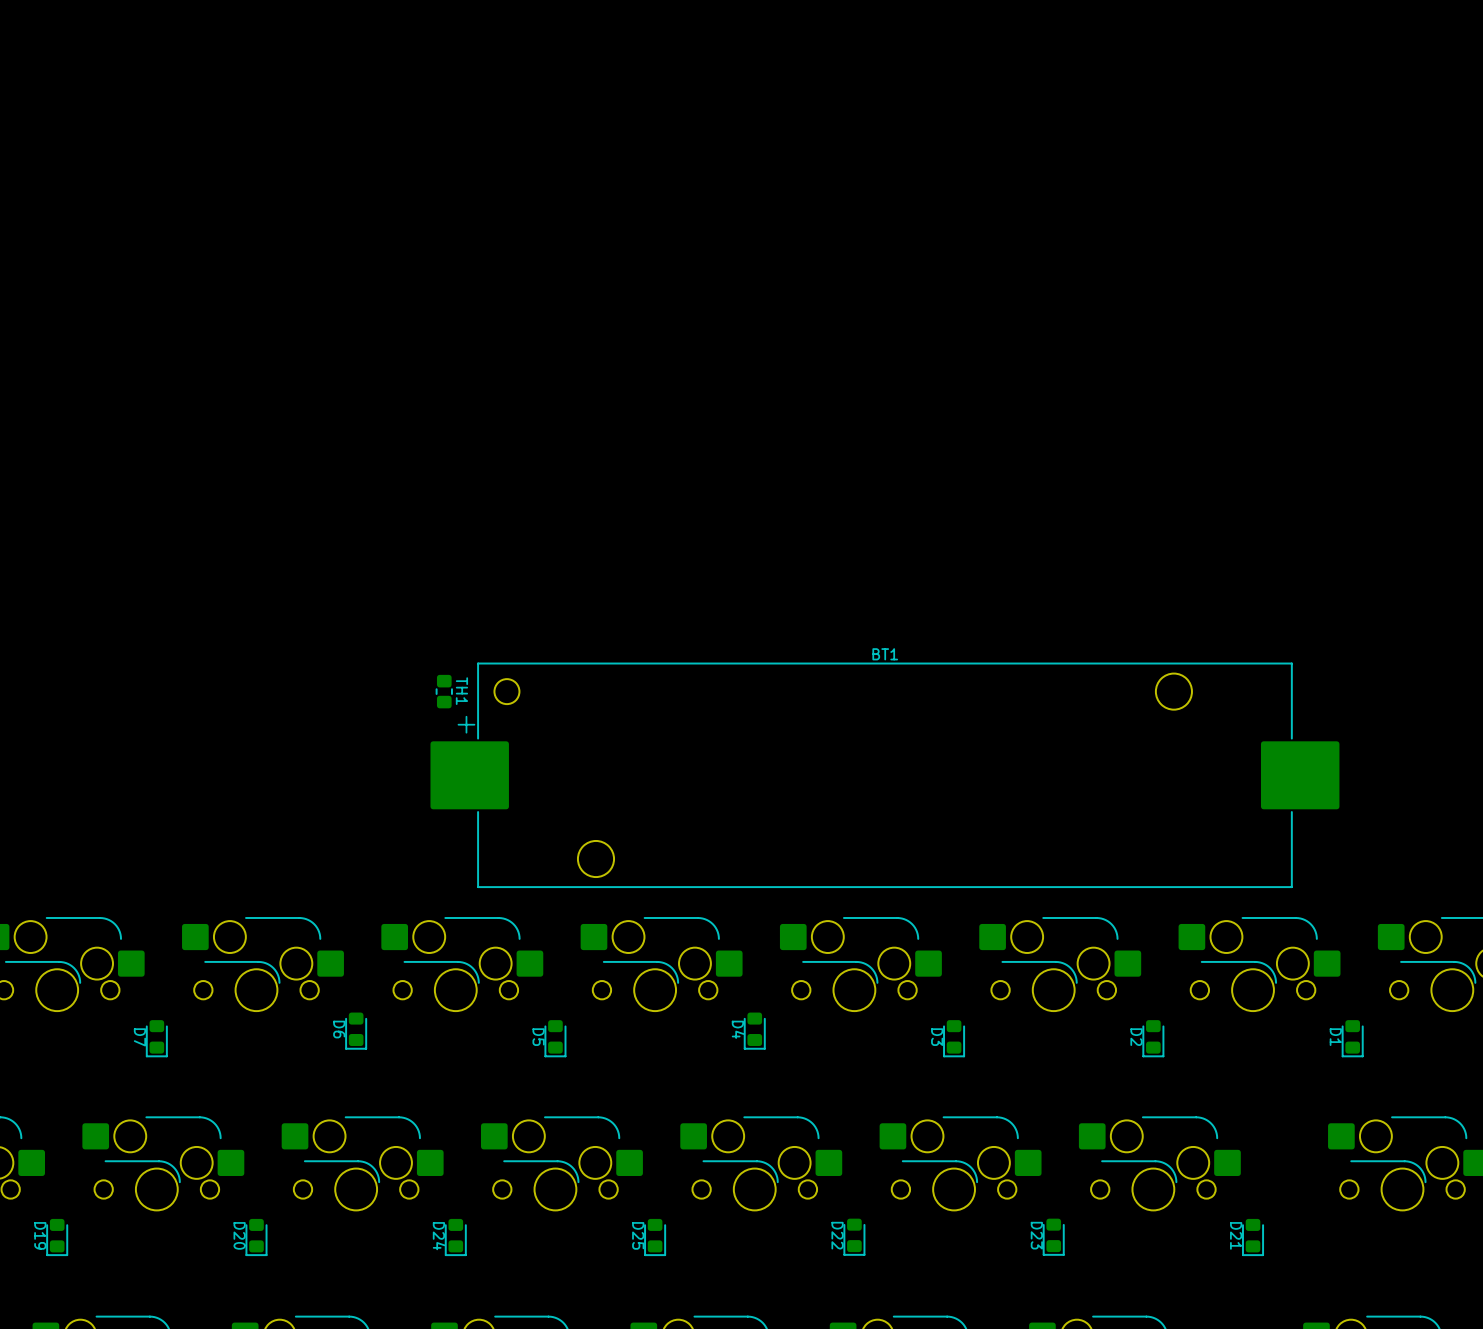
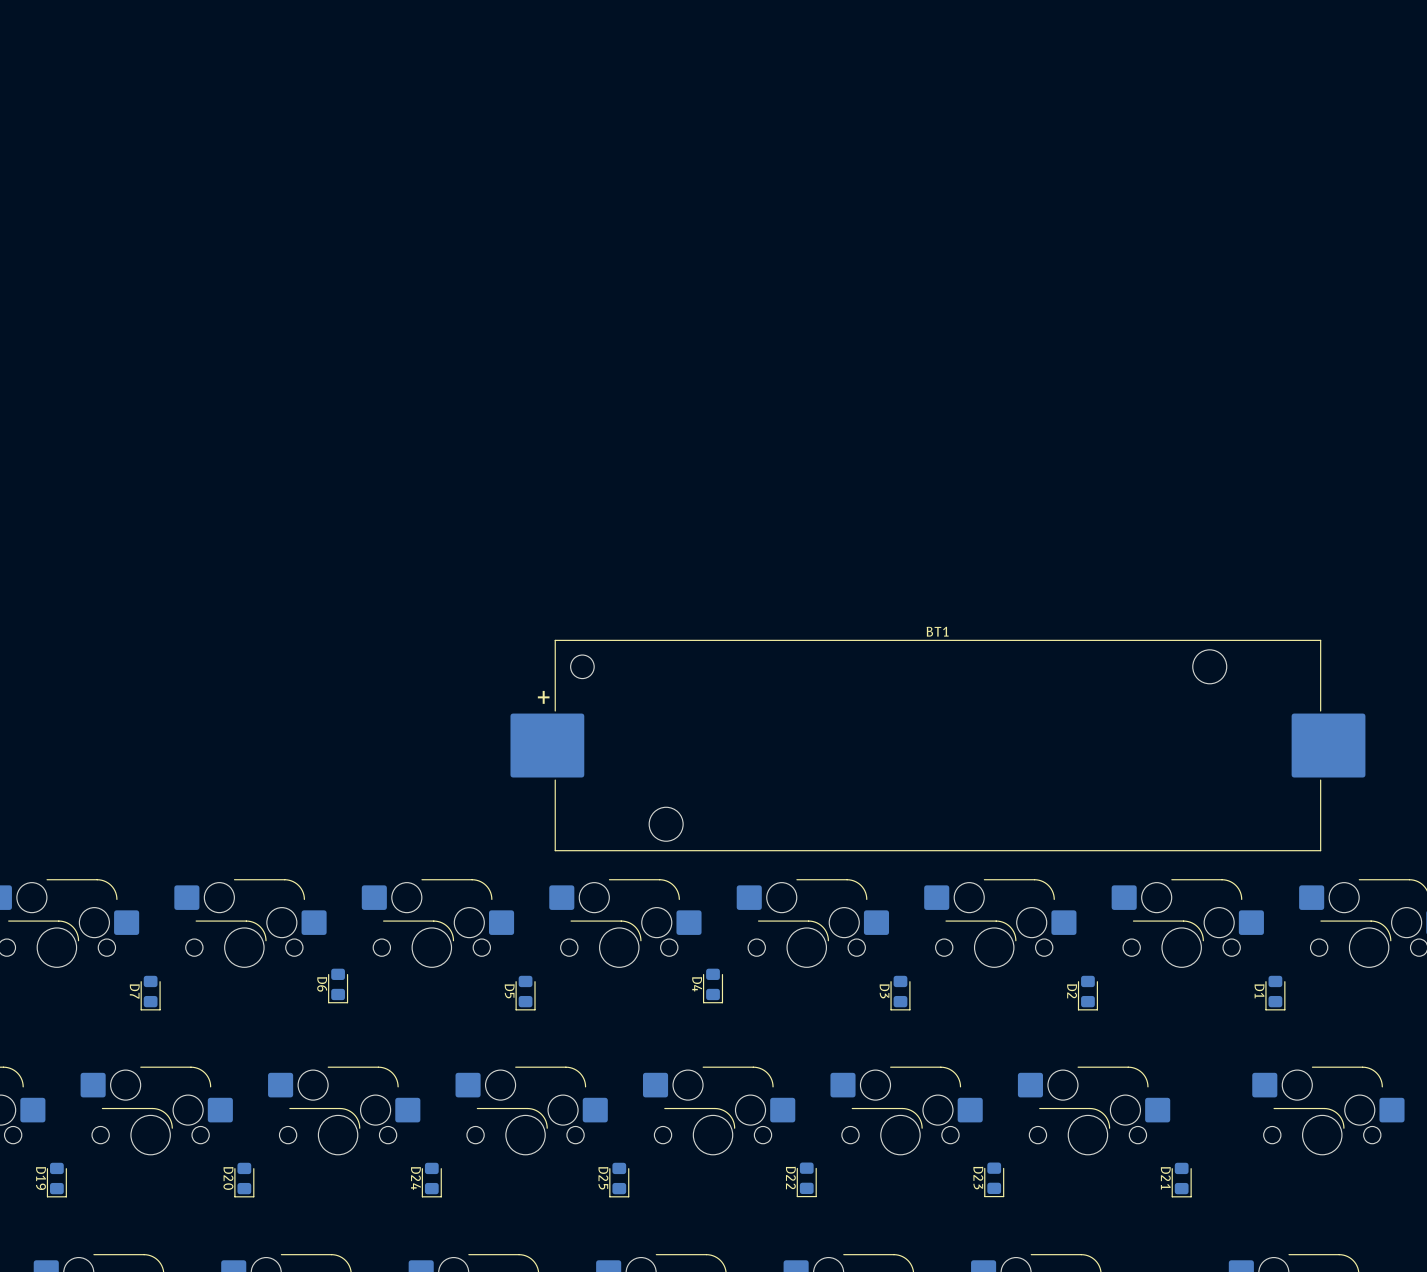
TH1: (444, 691) -> none
BT1 position: (884, 775) -> (937, 745)

